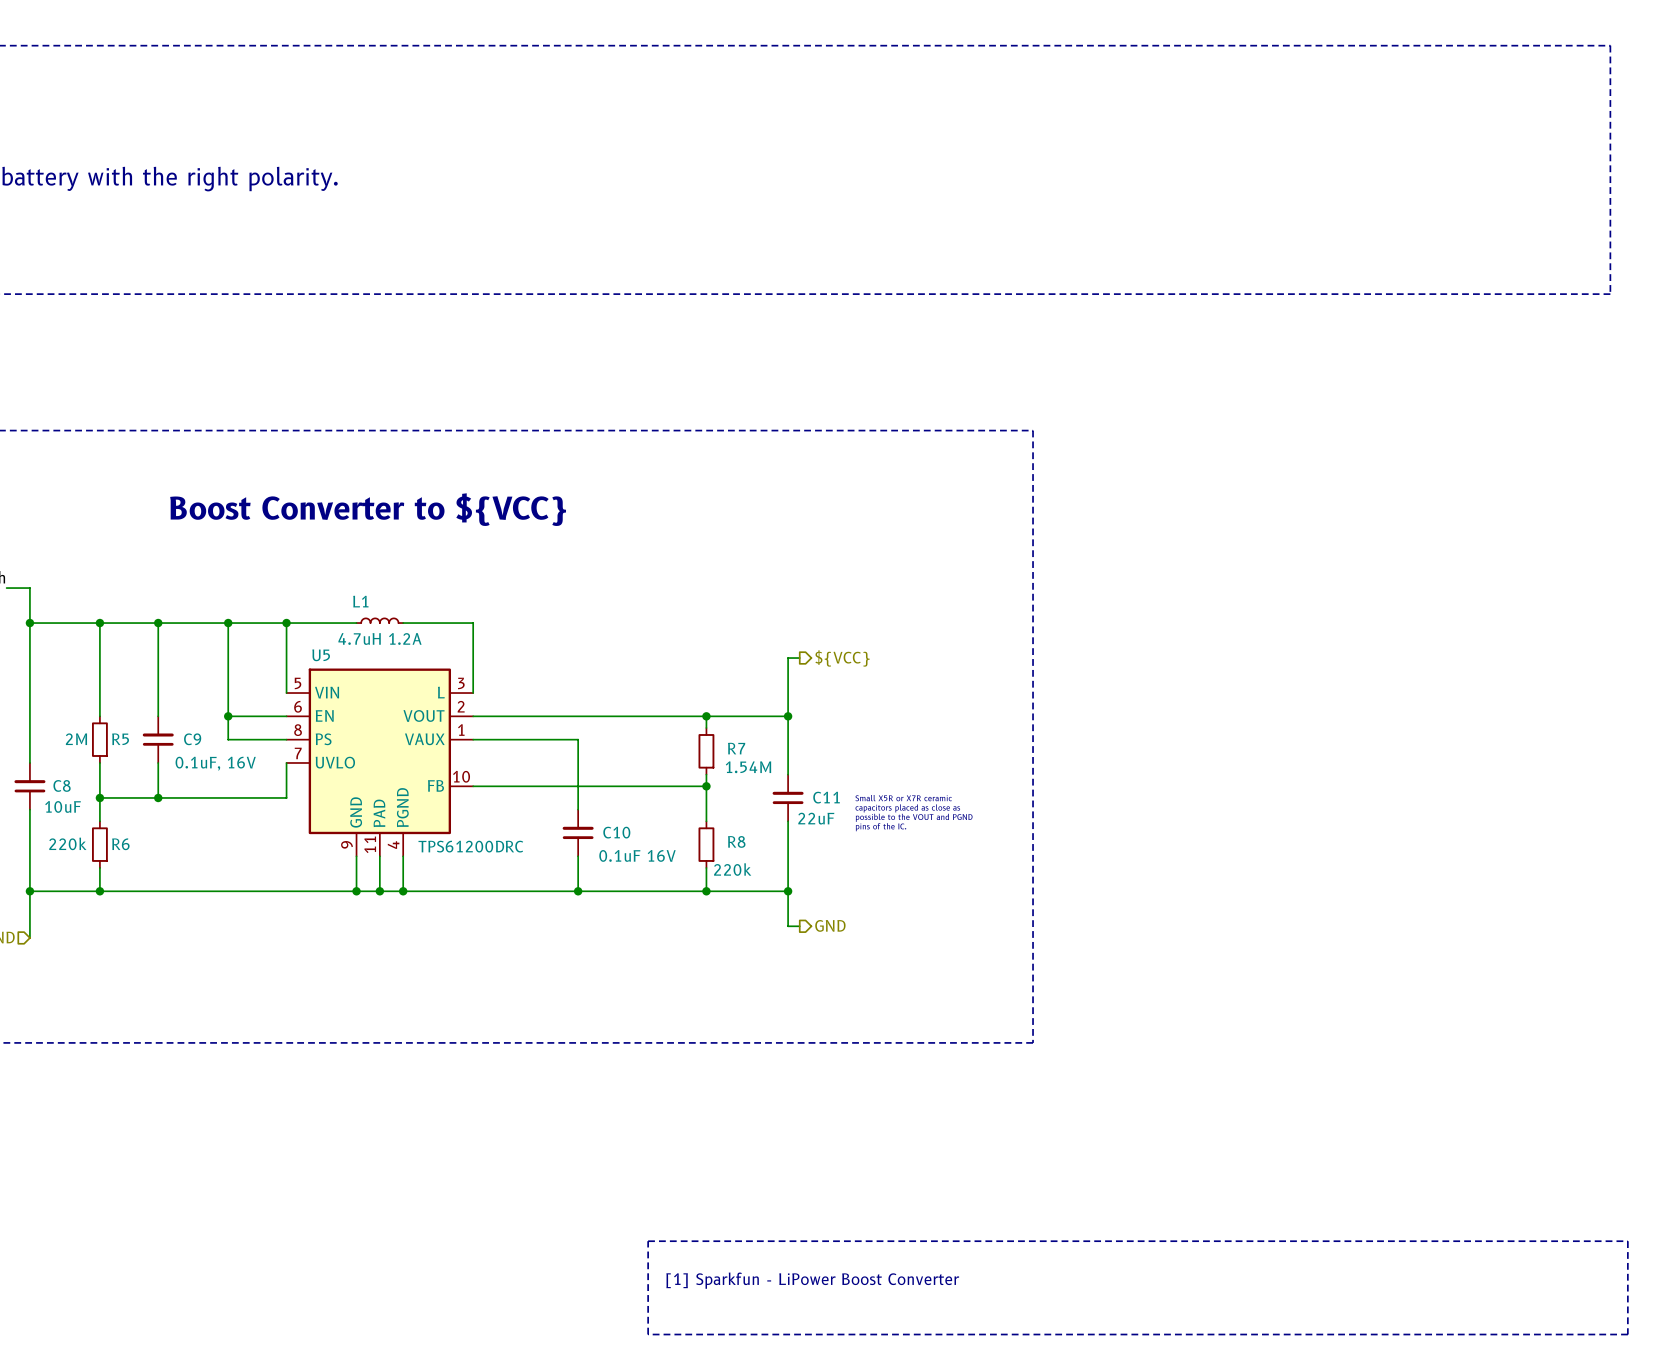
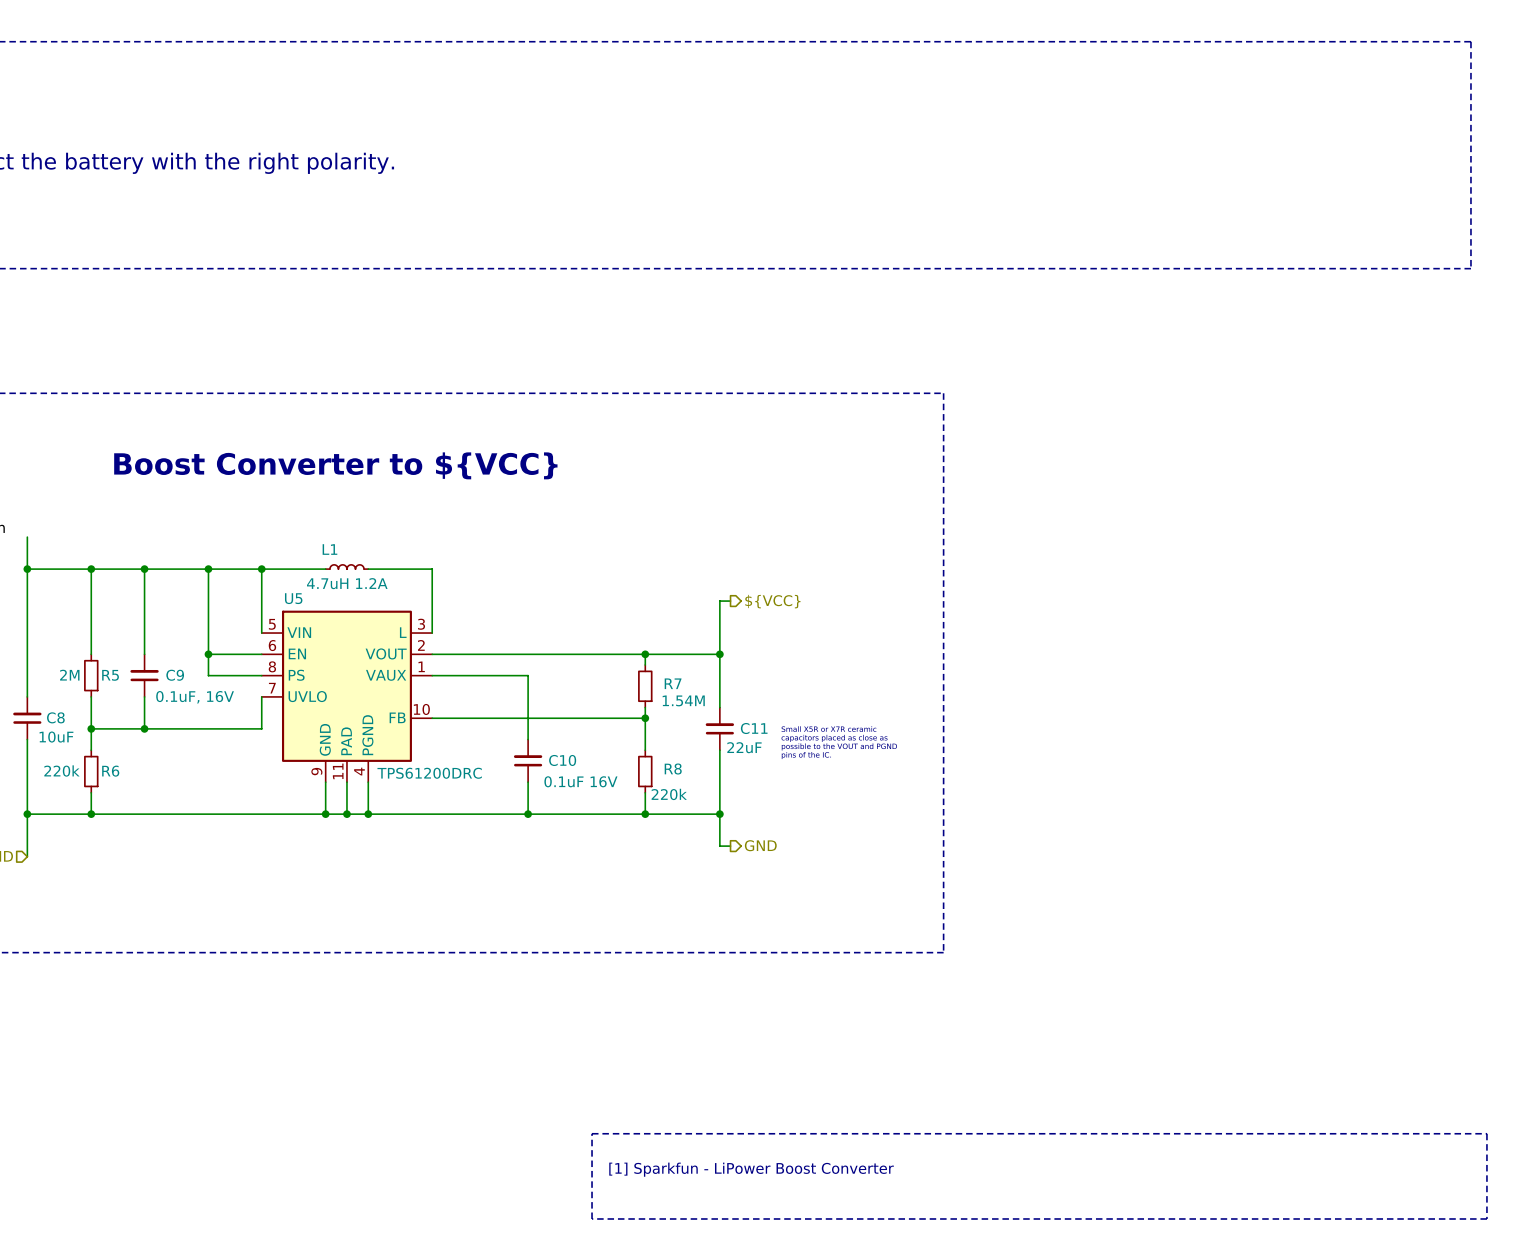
wire: (6, 588) (29, 588) -> none

